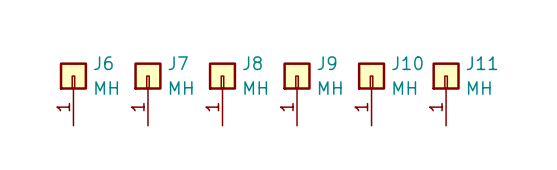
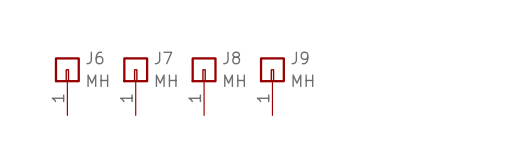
J10: MH (371, 94) -> none
J11: MH (446, 94) -> none

